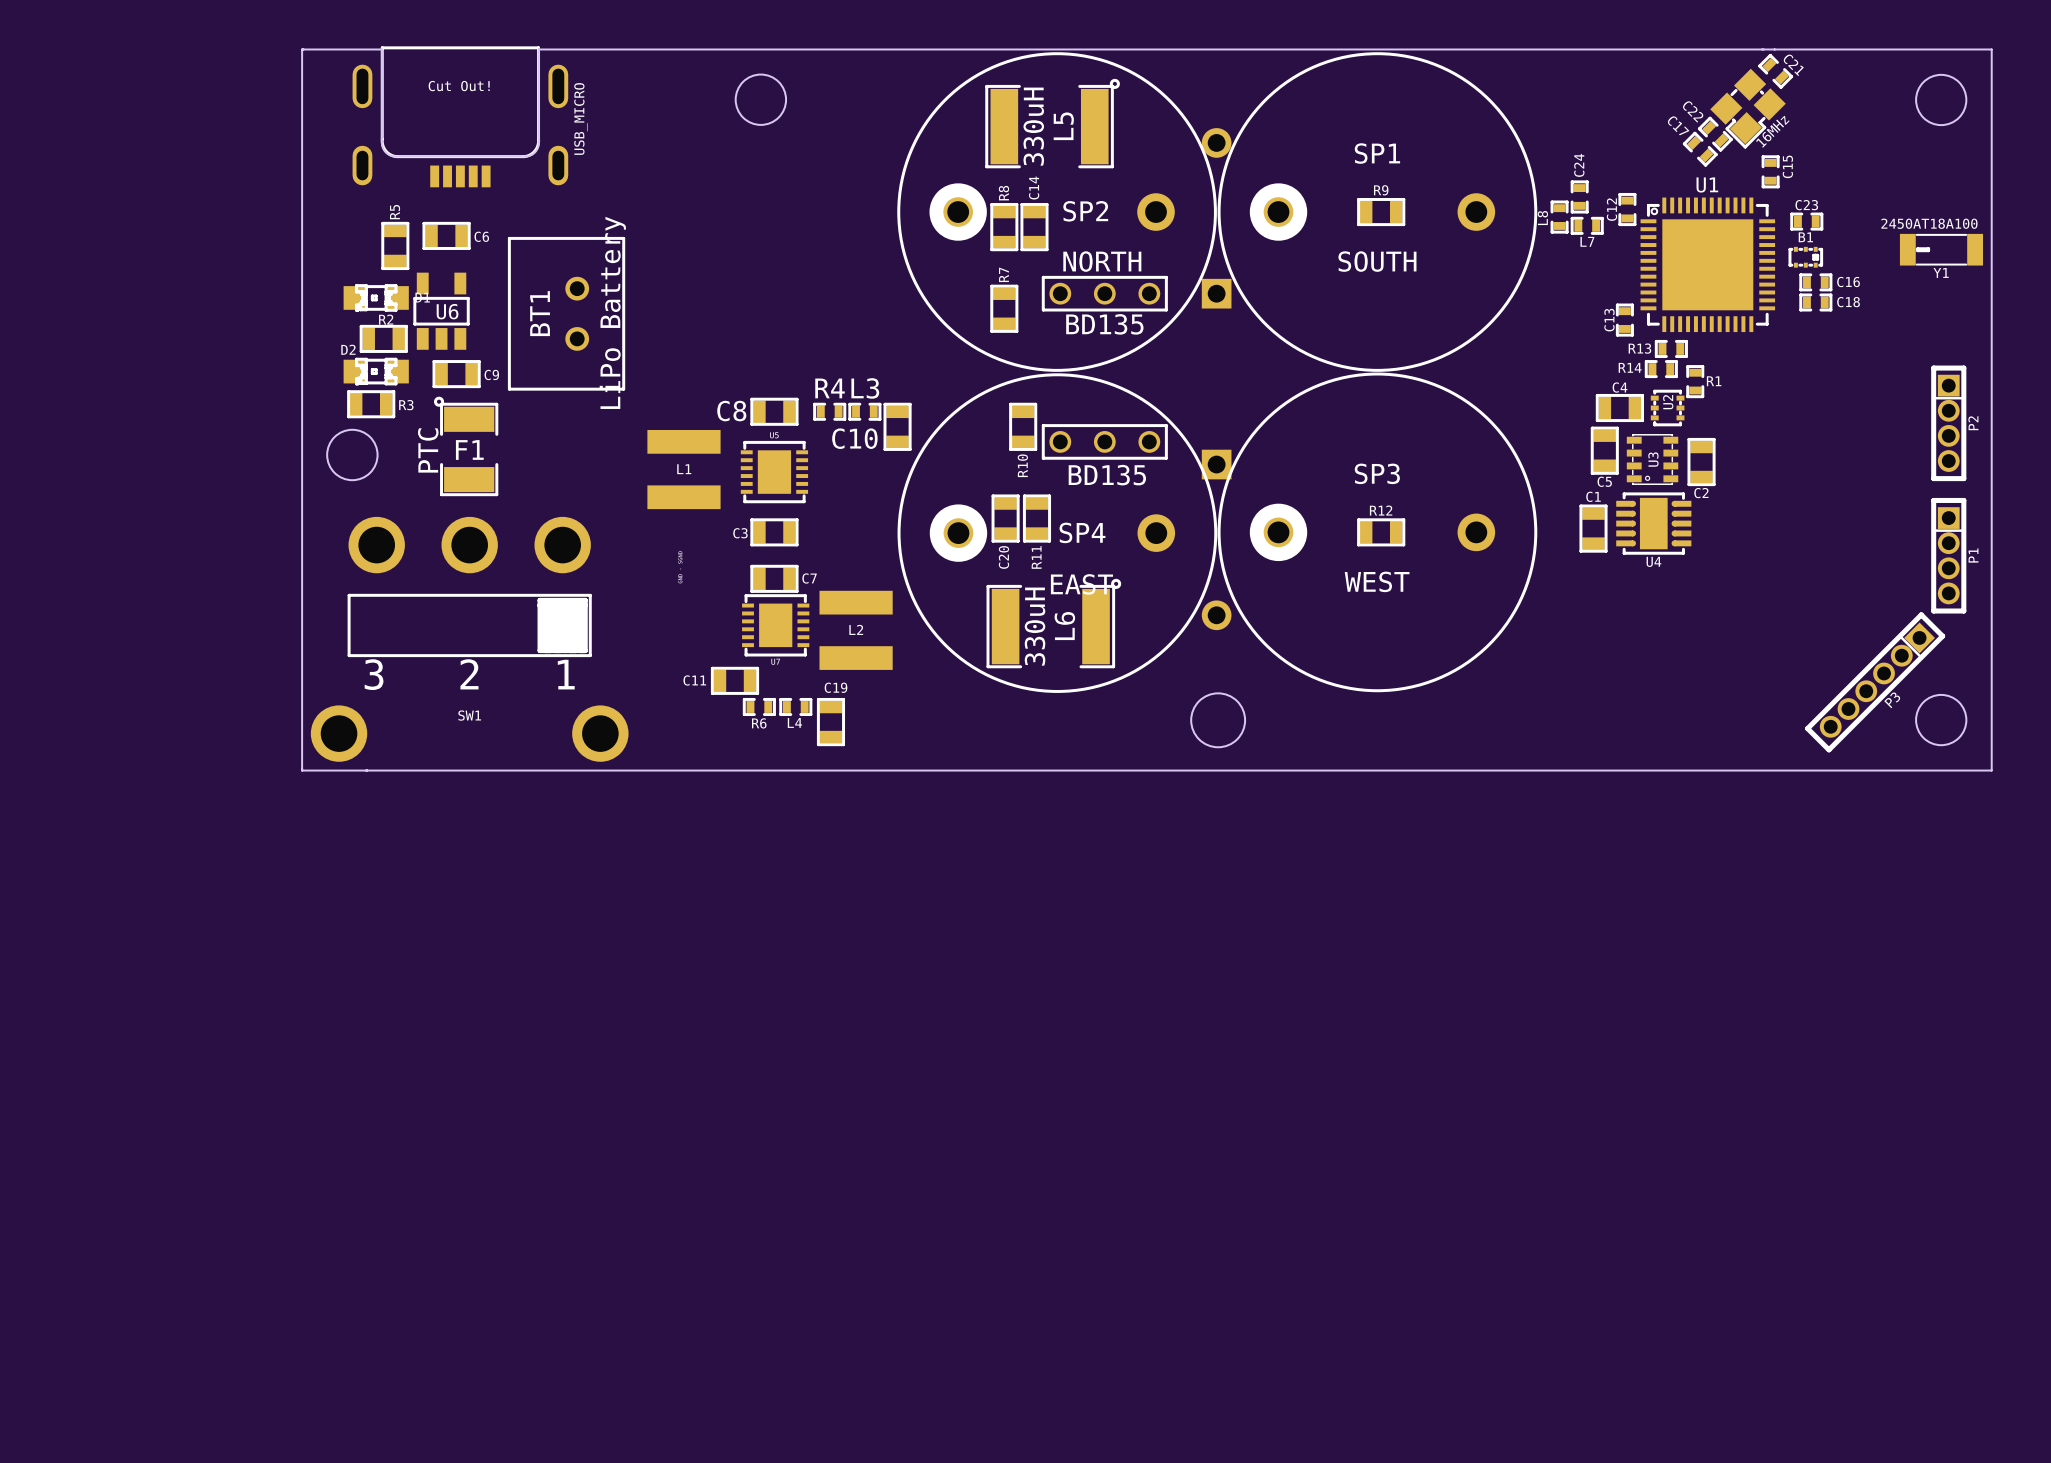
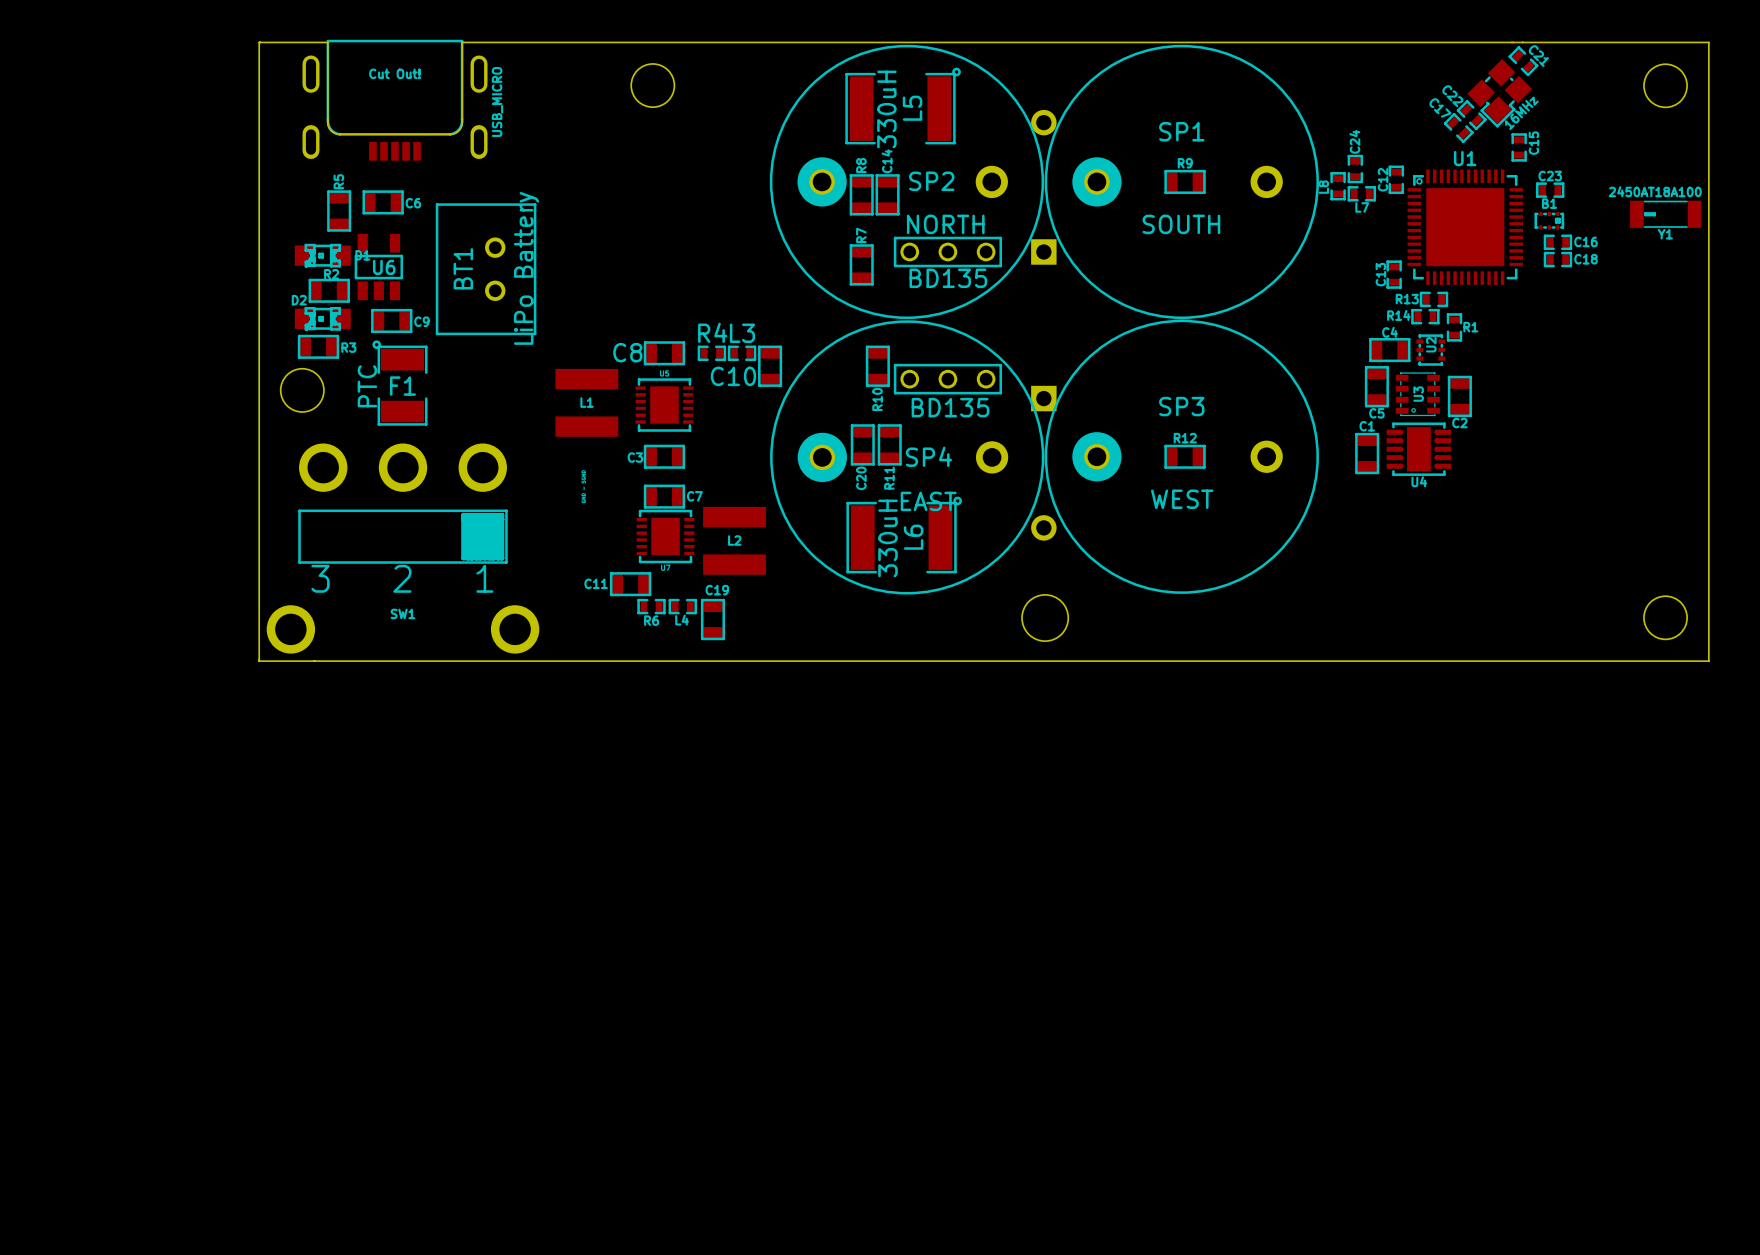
P2: (1948, 423) -> none
P1: (1948, 555) -> none
P3: (1875, 682) -> none

